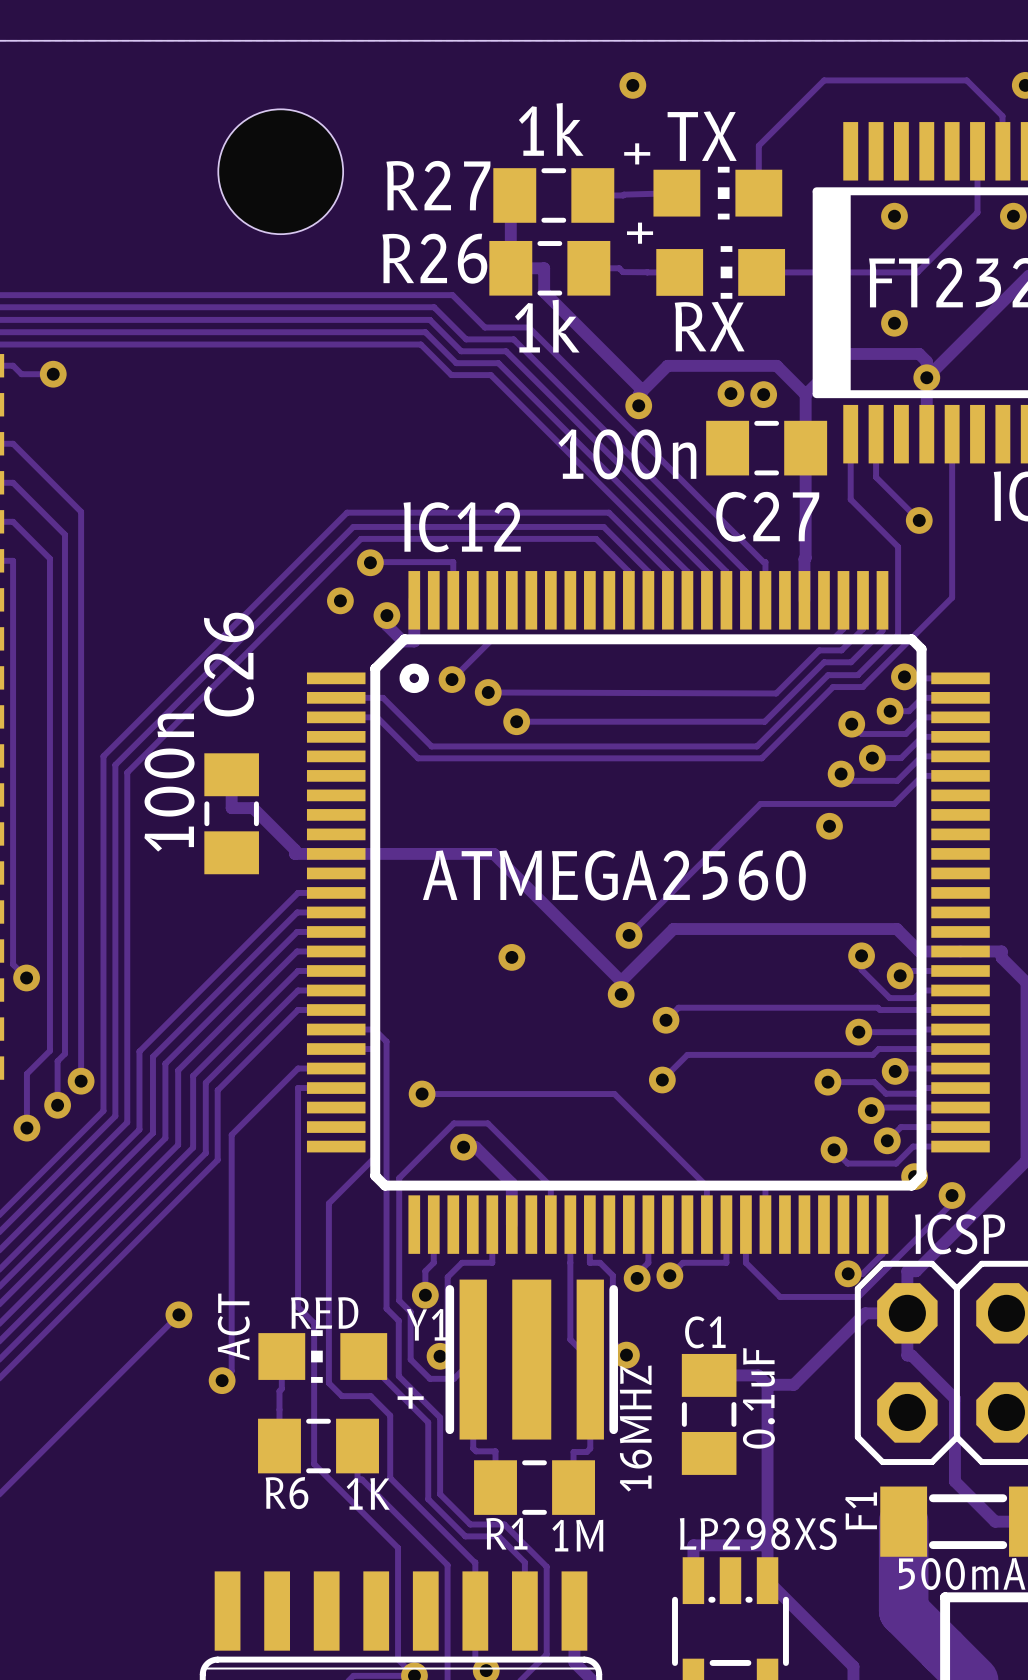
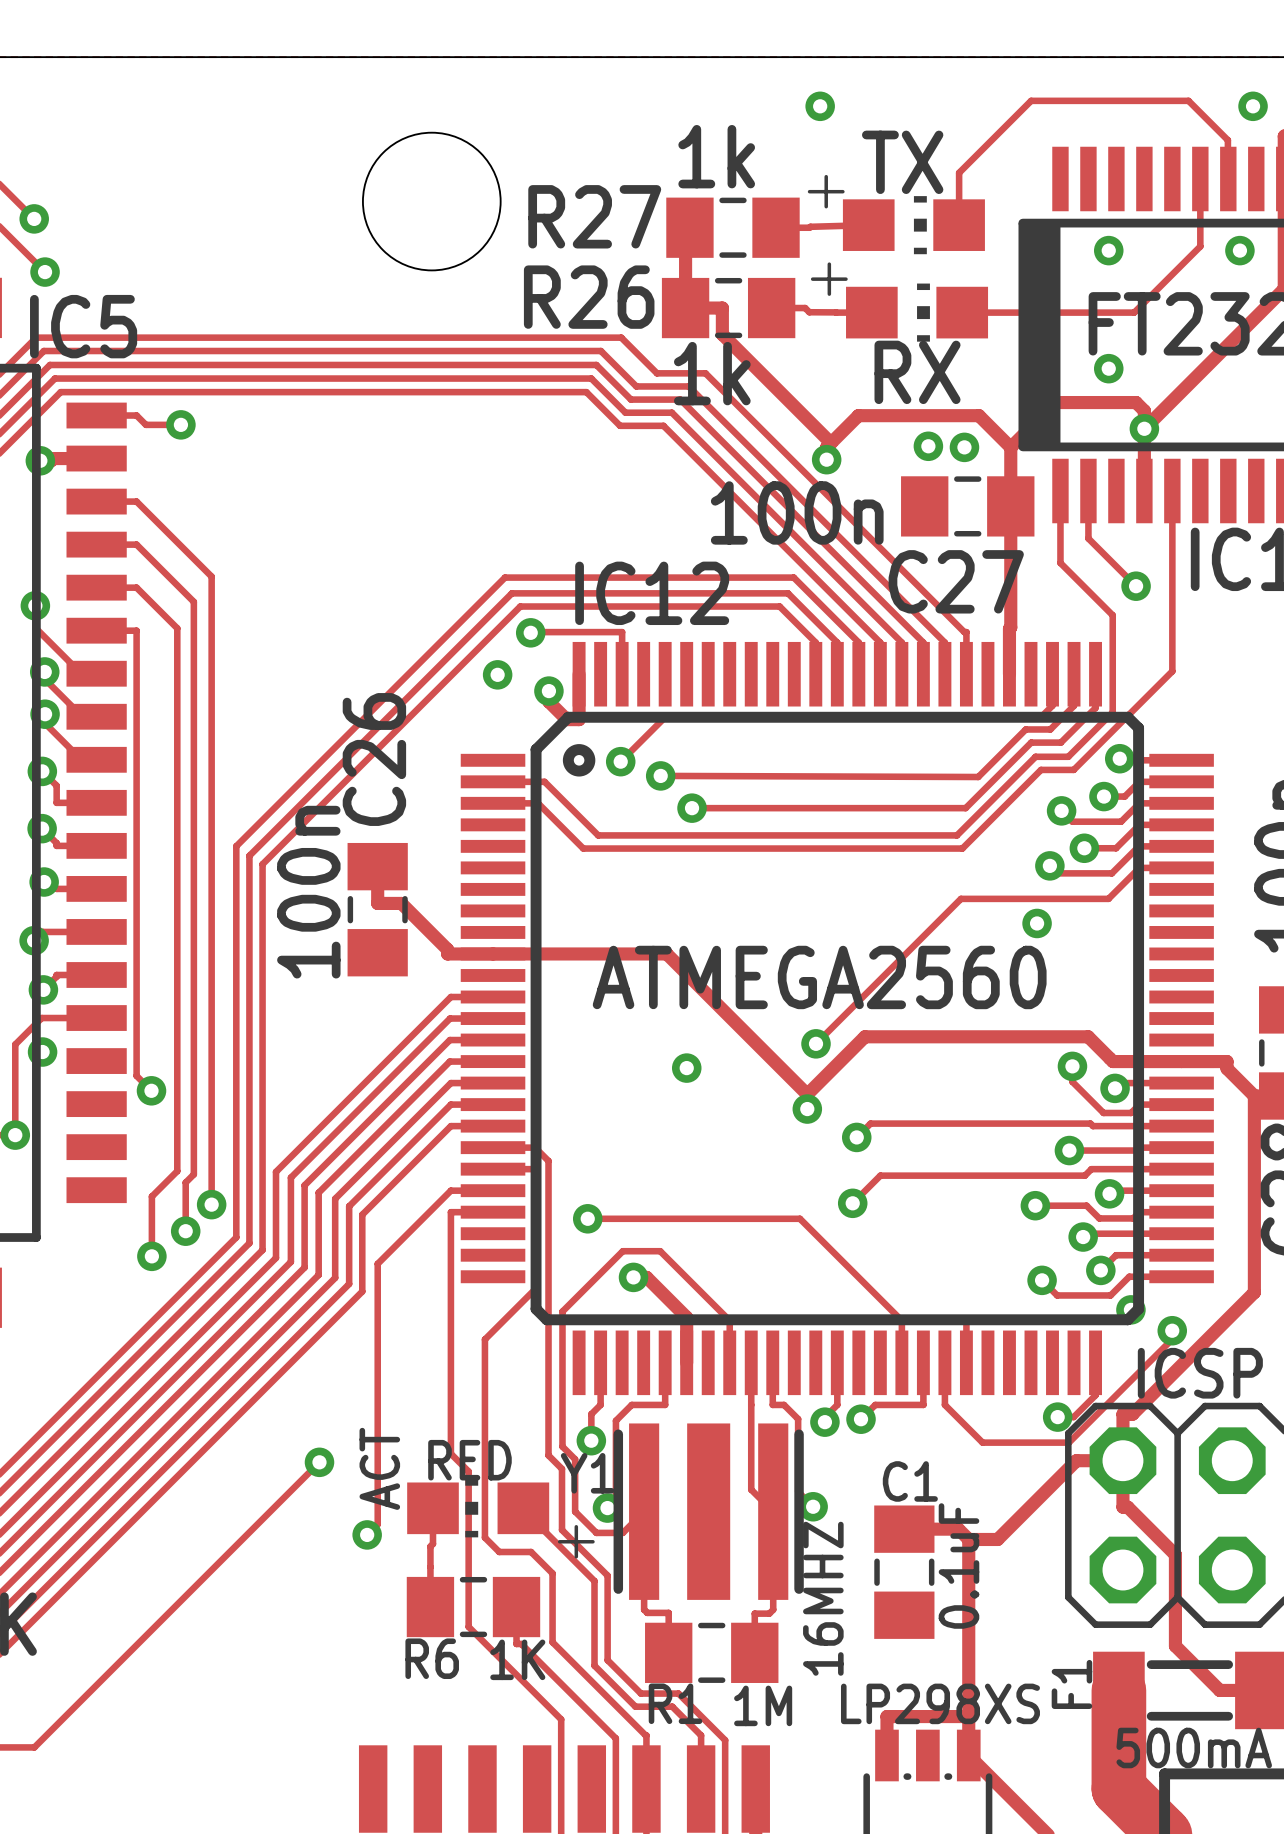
track: (875, 929) (896, 929) (919, 951) -> (1088, 1036) (1112, 1061) (1136, 1061)

